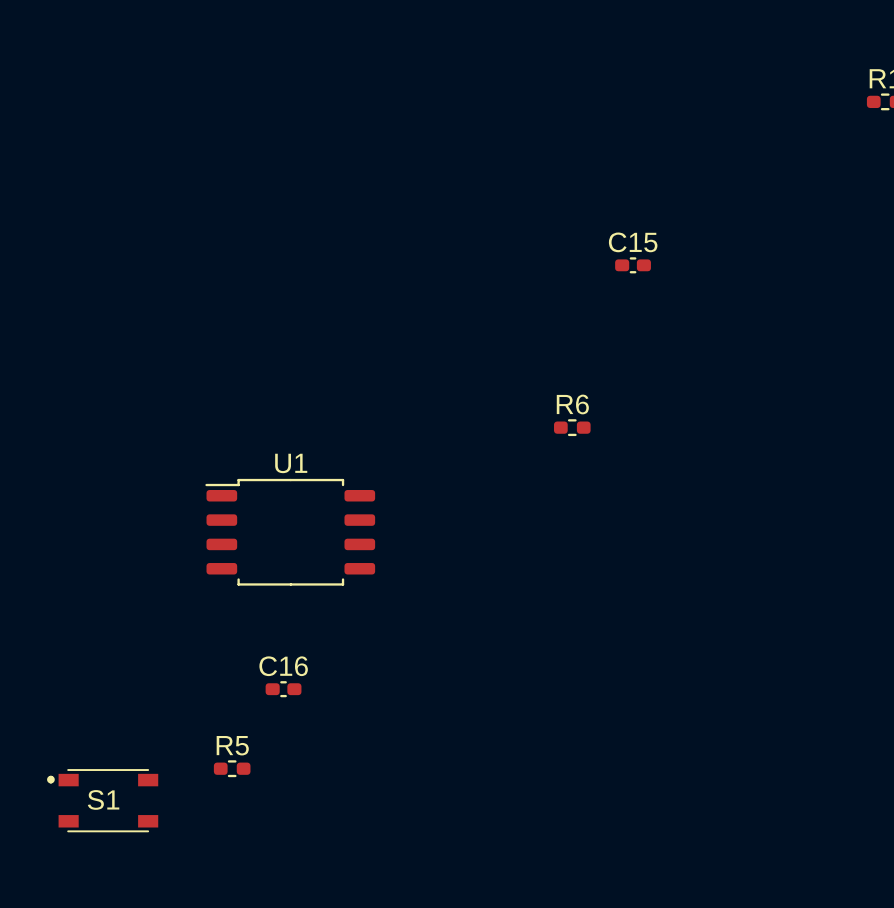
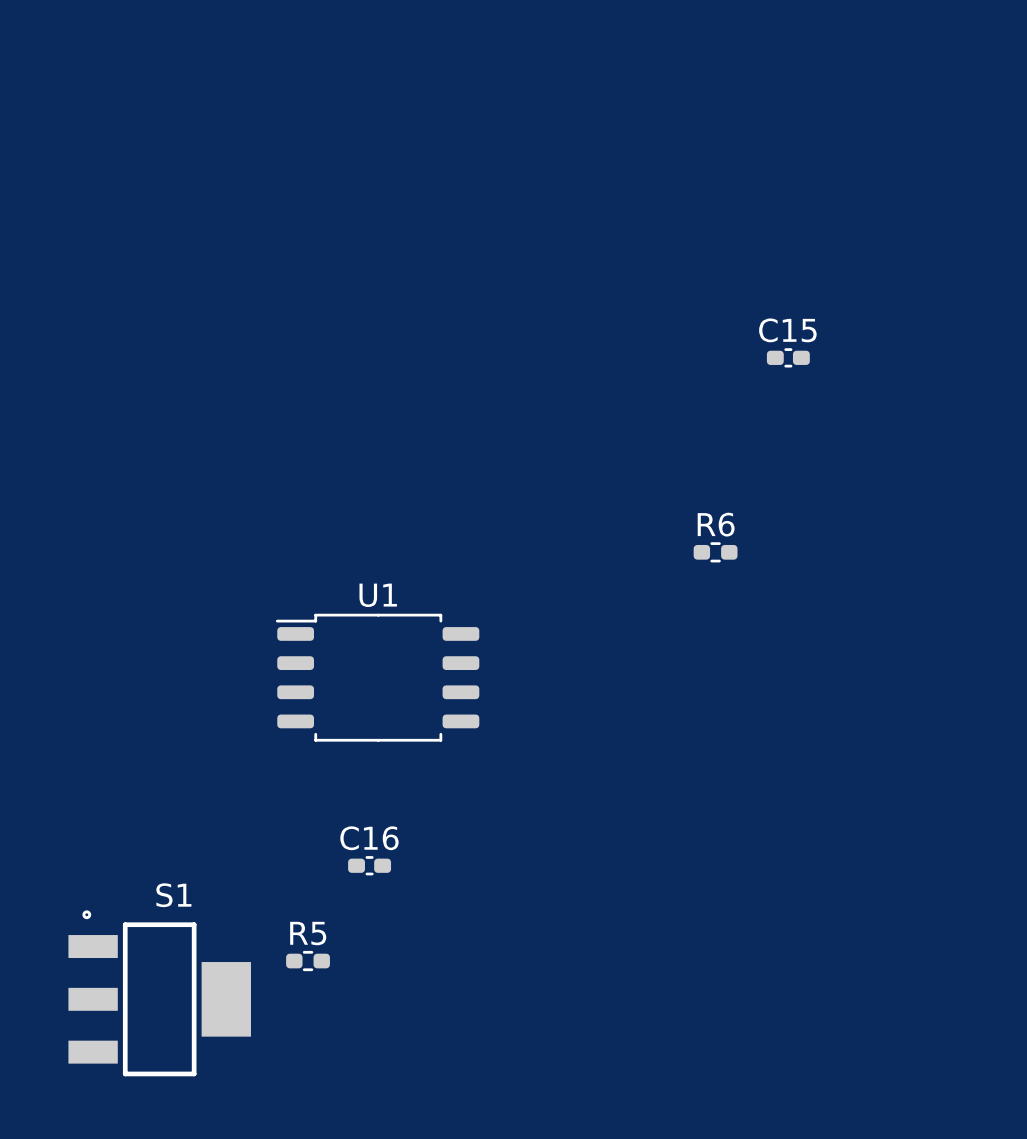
S1 footprint: [47, 769, 159, 833] -> [68, 910, 251, 1077]
S1 name position: S1 (103, 799) -> S1 (173, 895)

